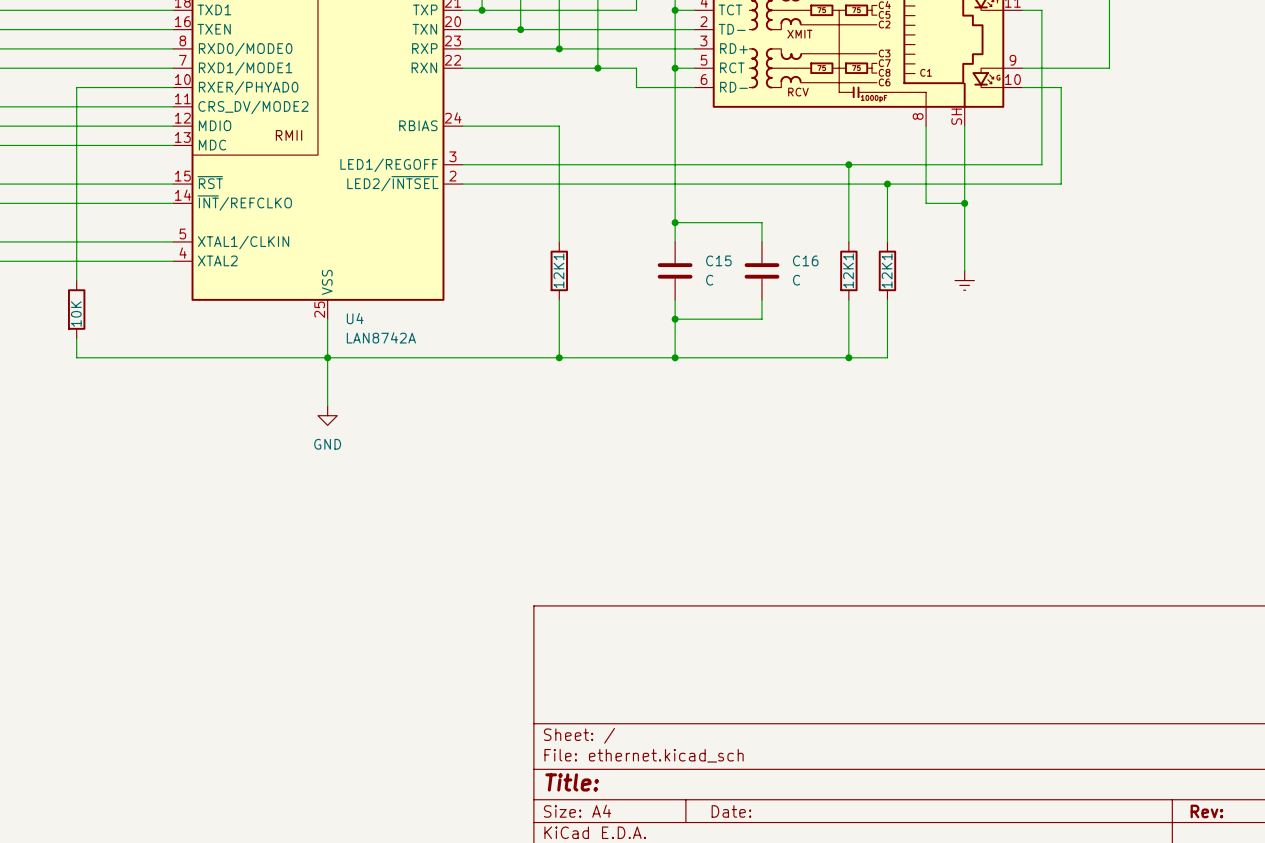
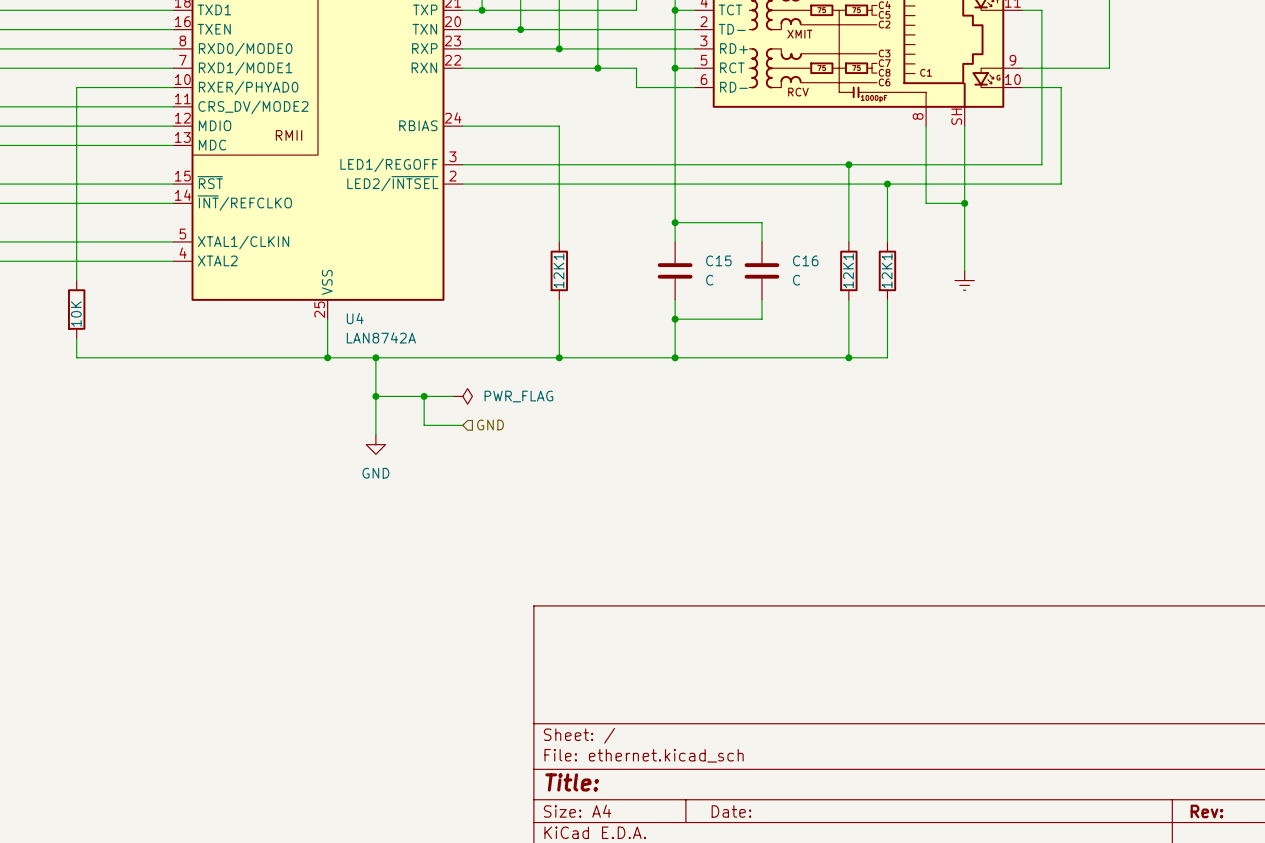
wire: (327, 357) (327, 406) -> none
wire: none -> (375, 357) (375, 435)
junction: none -> (375, 357)
wire: none -> (375, 396) (453, 396)
junction: none -> (375, 396)
wire: none -> (424, 396) (424, 425) (462, 425)
junction: none -> (424, 396)
power symbol: none -> PWR_FLAG (462, 396)
power symbol position: GND (327, 415) -> GND (375, 444)
hierarchical label: none -> GND (490, 424)

